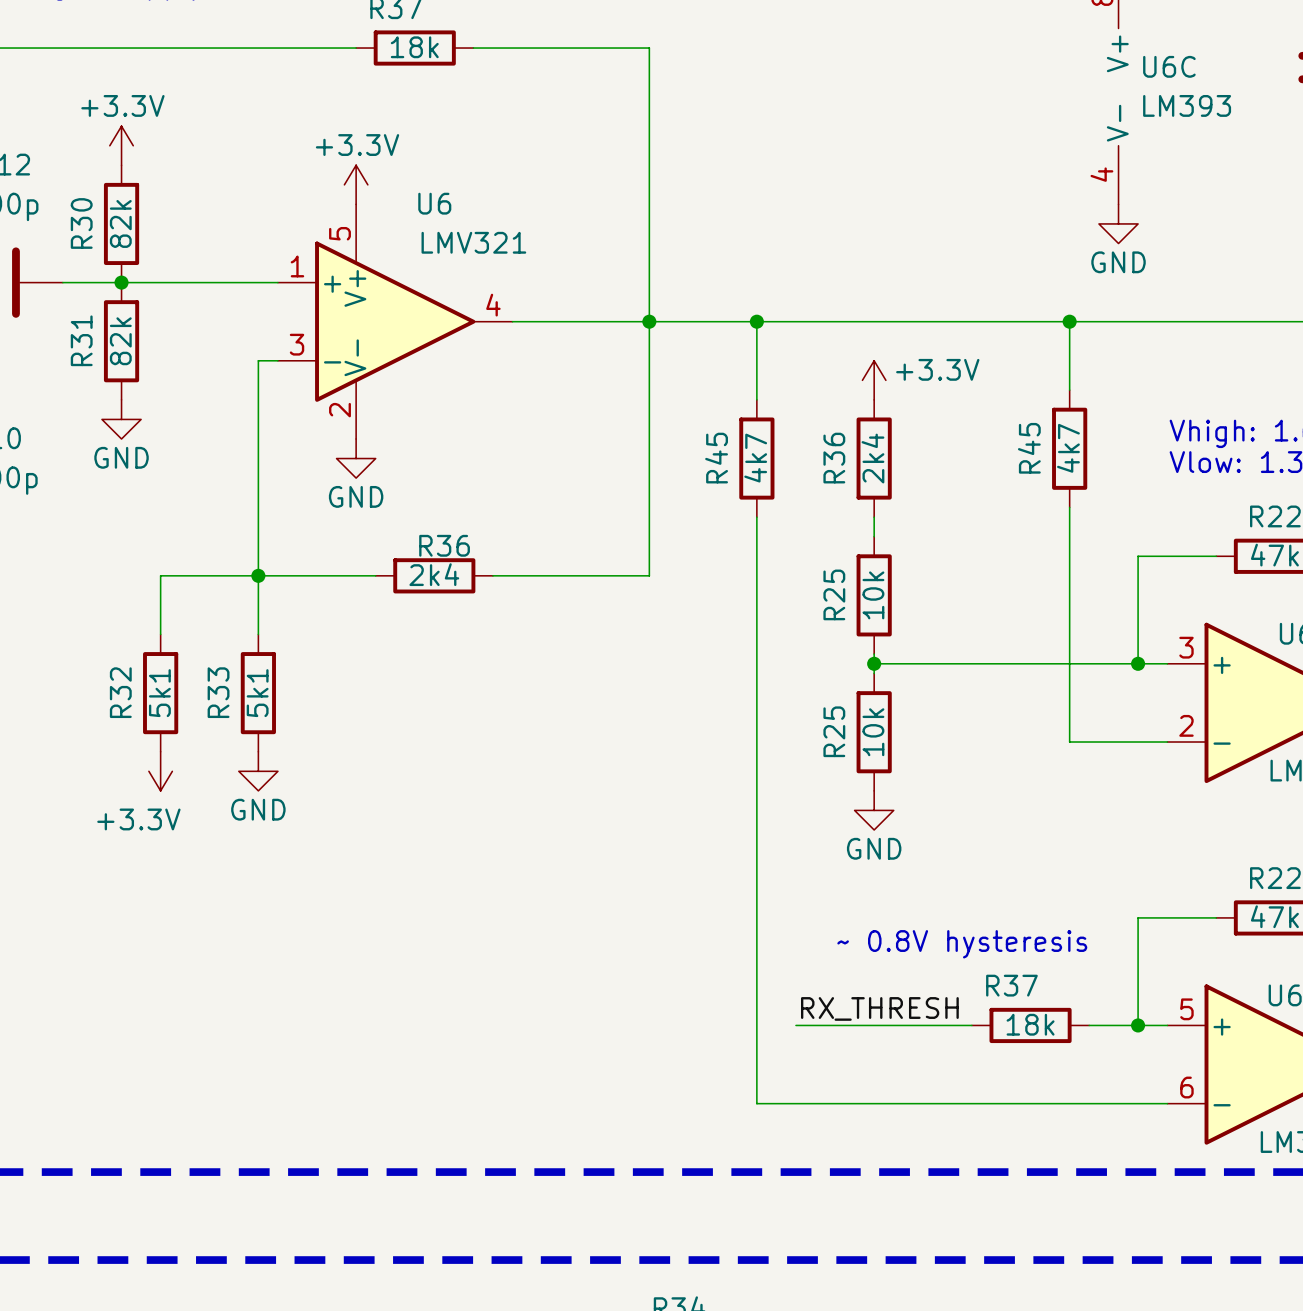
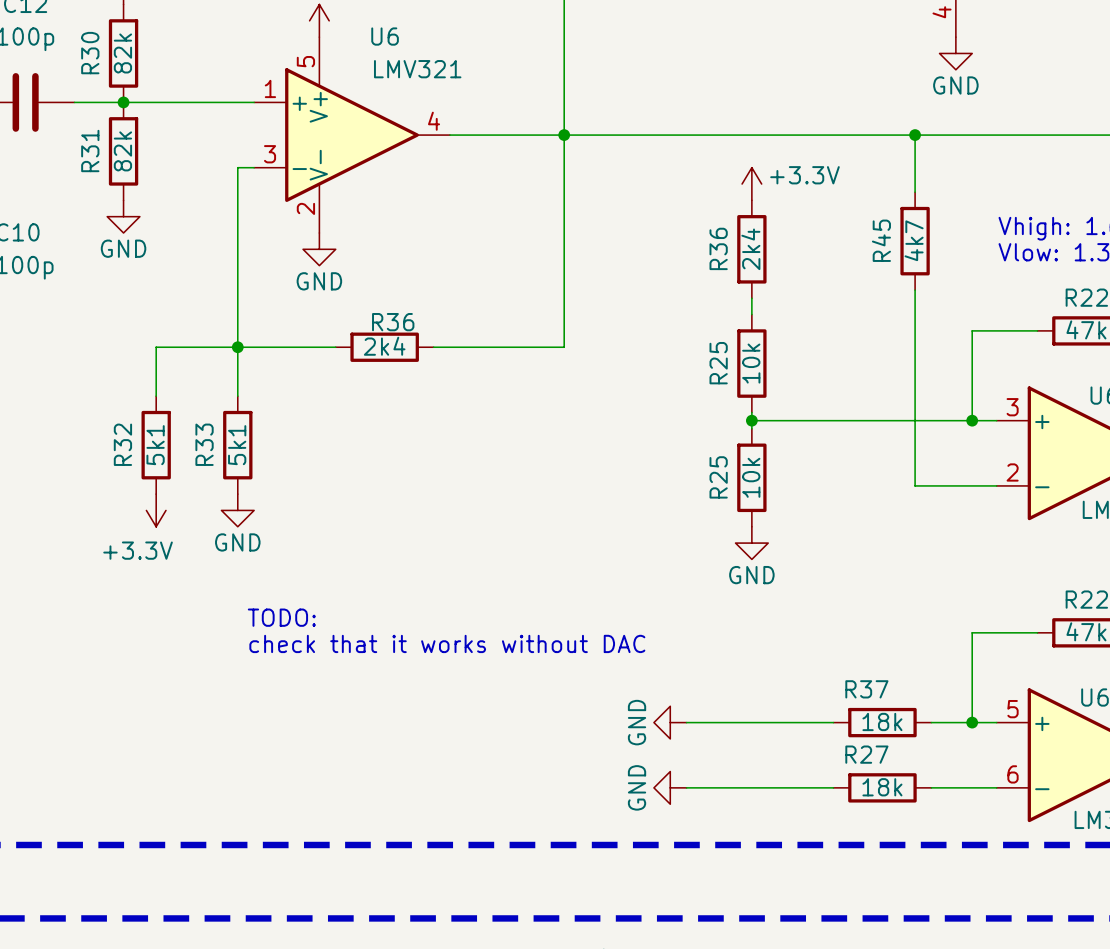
wire: (756, 321) (756, 399) -> none
junction: (756, 321) -> none
R45: 4k7 (756, 458) -> none
wire: (756, 517) (756, 1103) (795, 1103) -> none
text: none -> TODO: (281, 617)
text: none -> check that it works without DAC (447, 643)
text: ~ 0.8V hysteresis (962, 944) -> none
label: RX_THRESH (879, 1008) -> none
power symbol: none -> GND (670, 722)
power symbol: none -> GND (670, 787)
wire: (971, 1103) (1089, 1103) -> none
R27: none -> 18k (882, 787)

